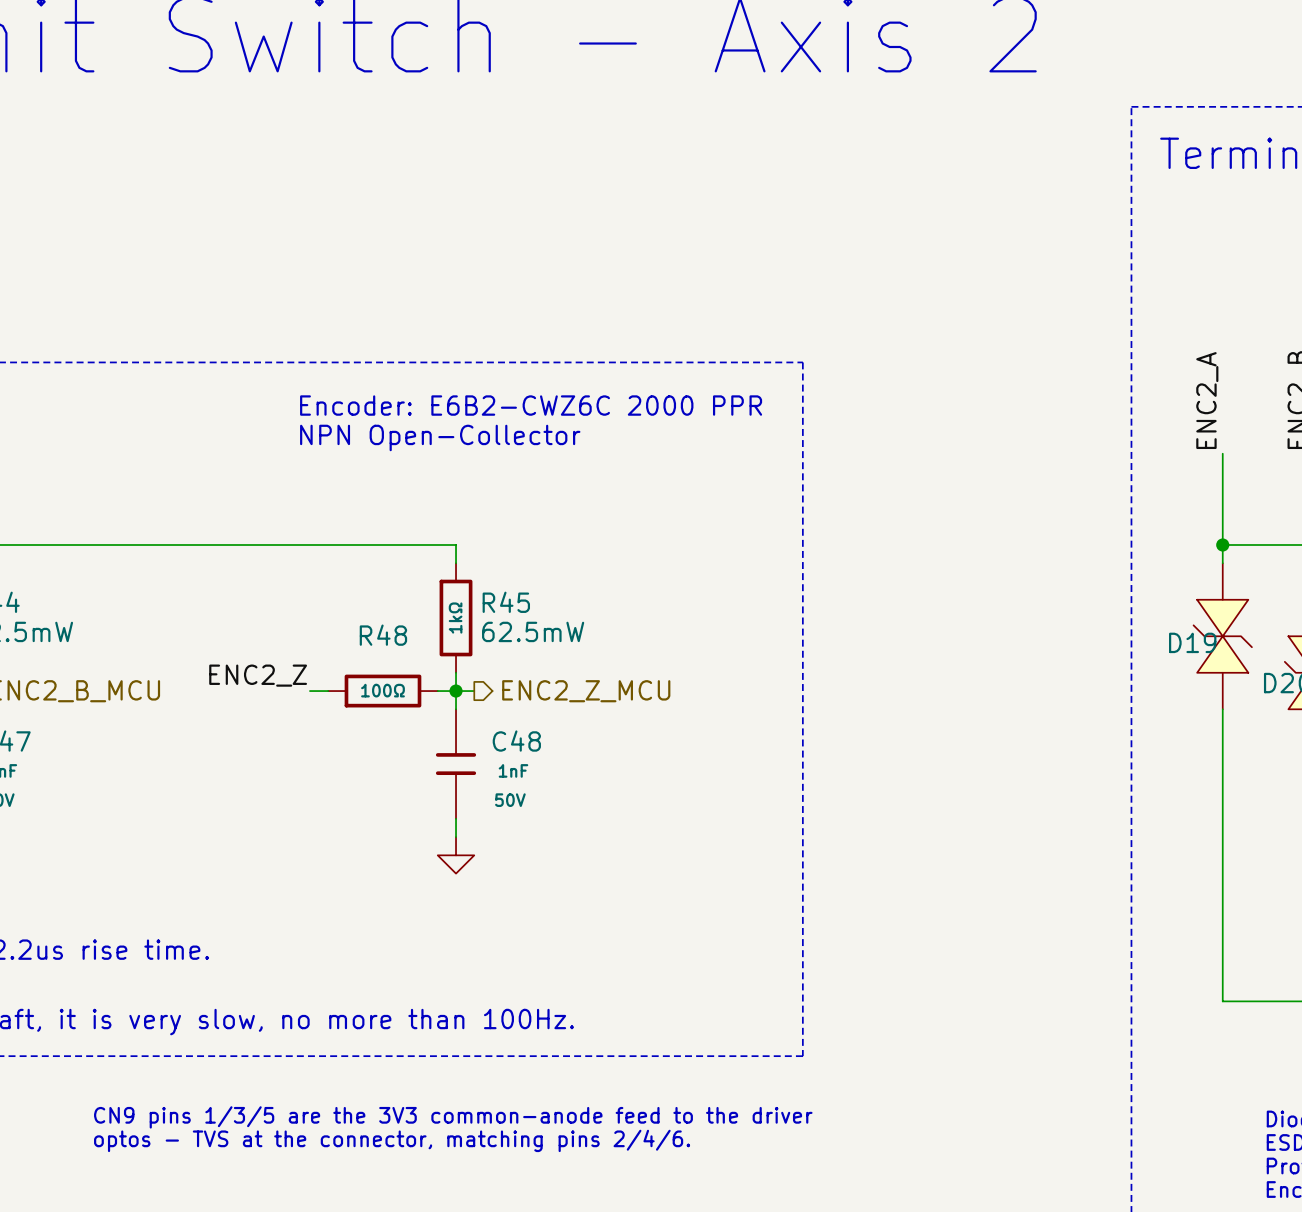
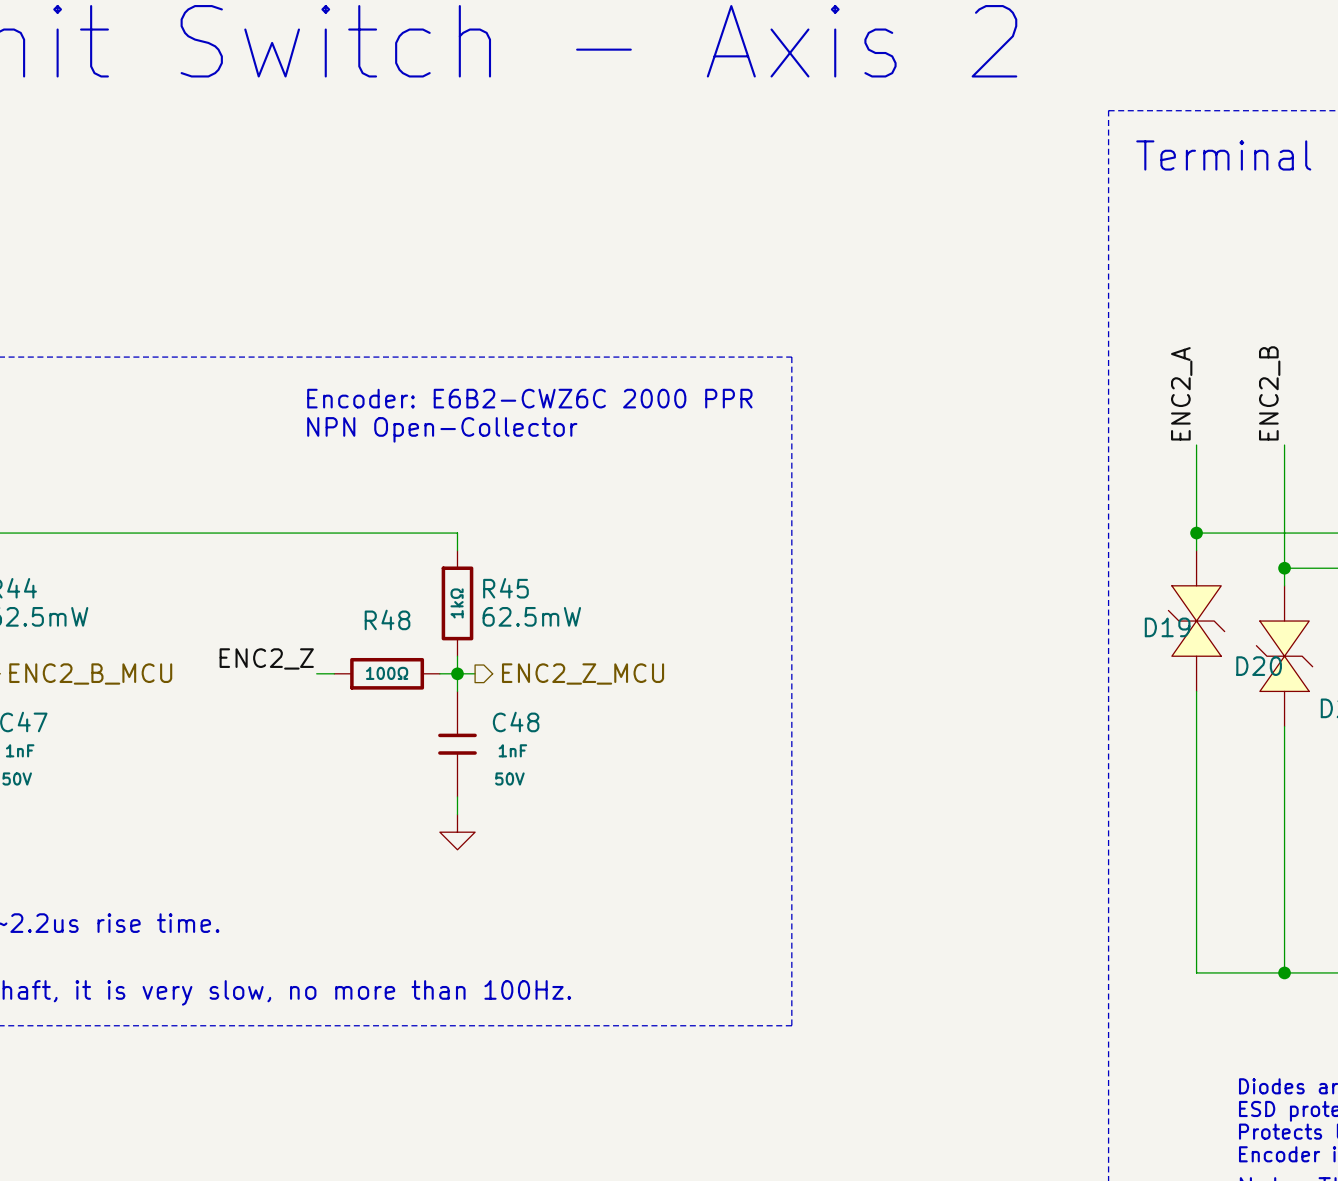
text: CN9 pins 1/3/5 are the 3V3 common-anode feed to the driver (453, 1117) -> none
text: optos - TVS at the connector, matching pins 2/4/6. (392, 1140) -> none

